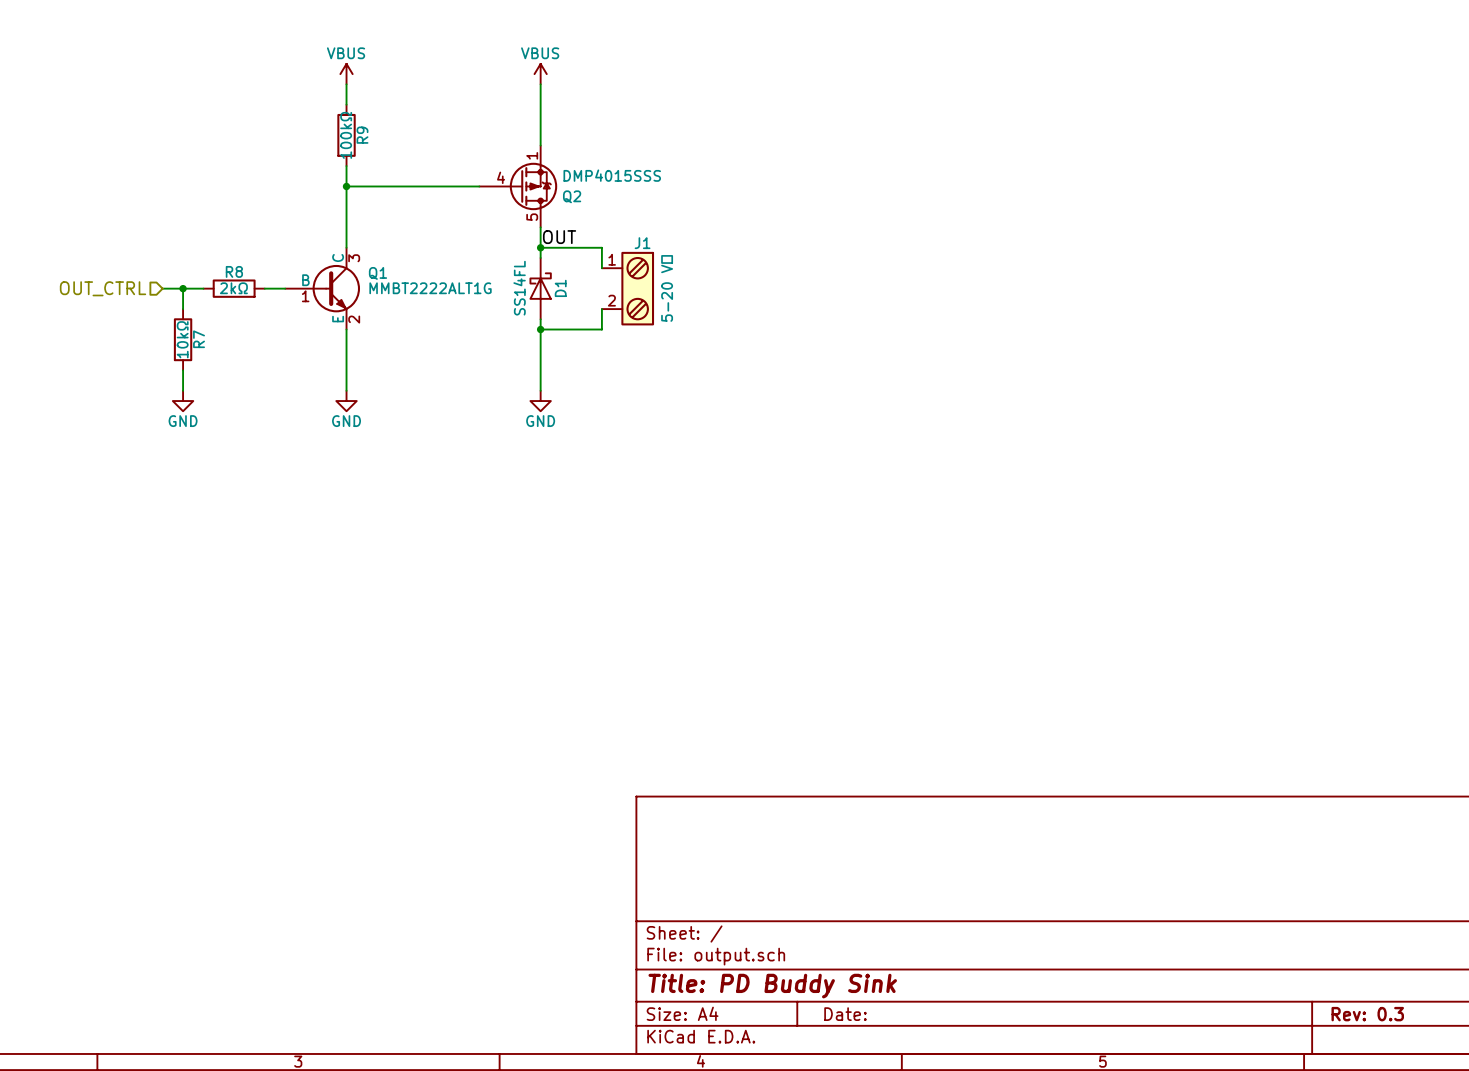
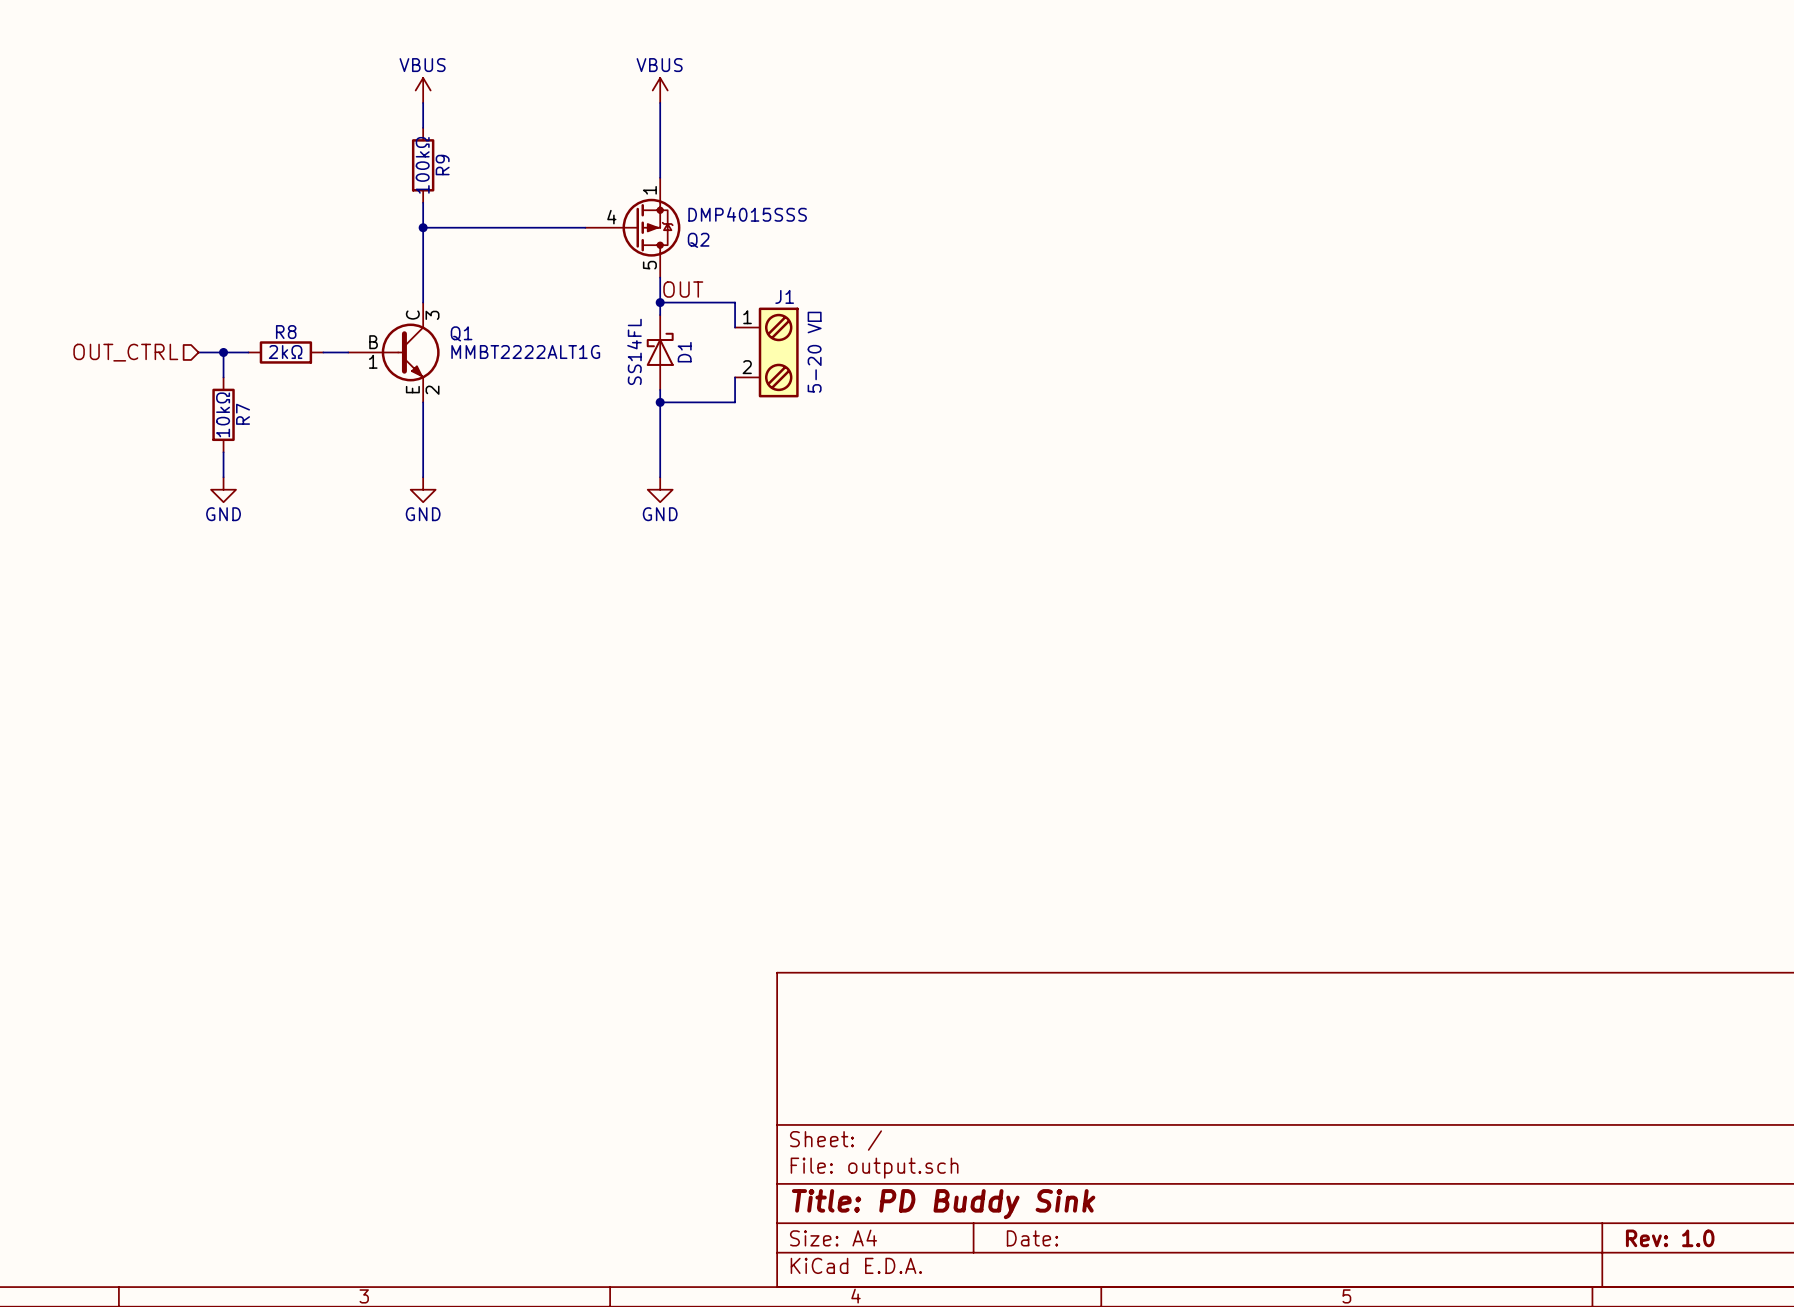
title block: Rev: 0.3 (1367, 1014) -> Rev: 1.0 (1670, 1238)

